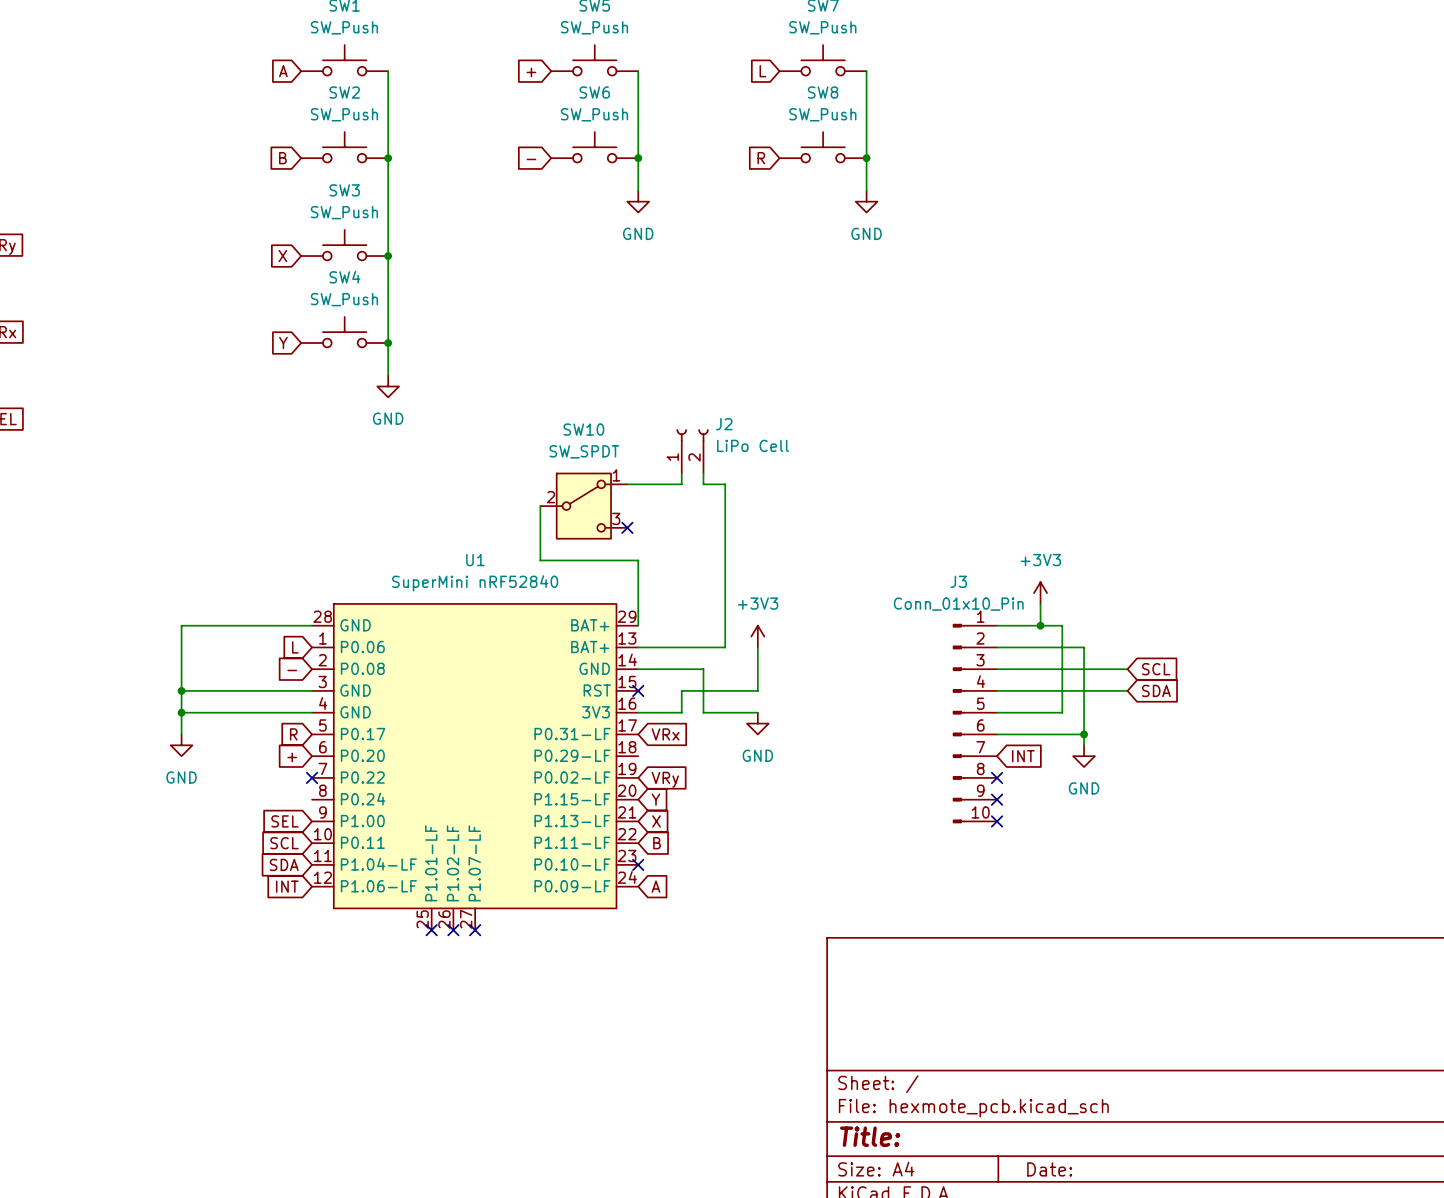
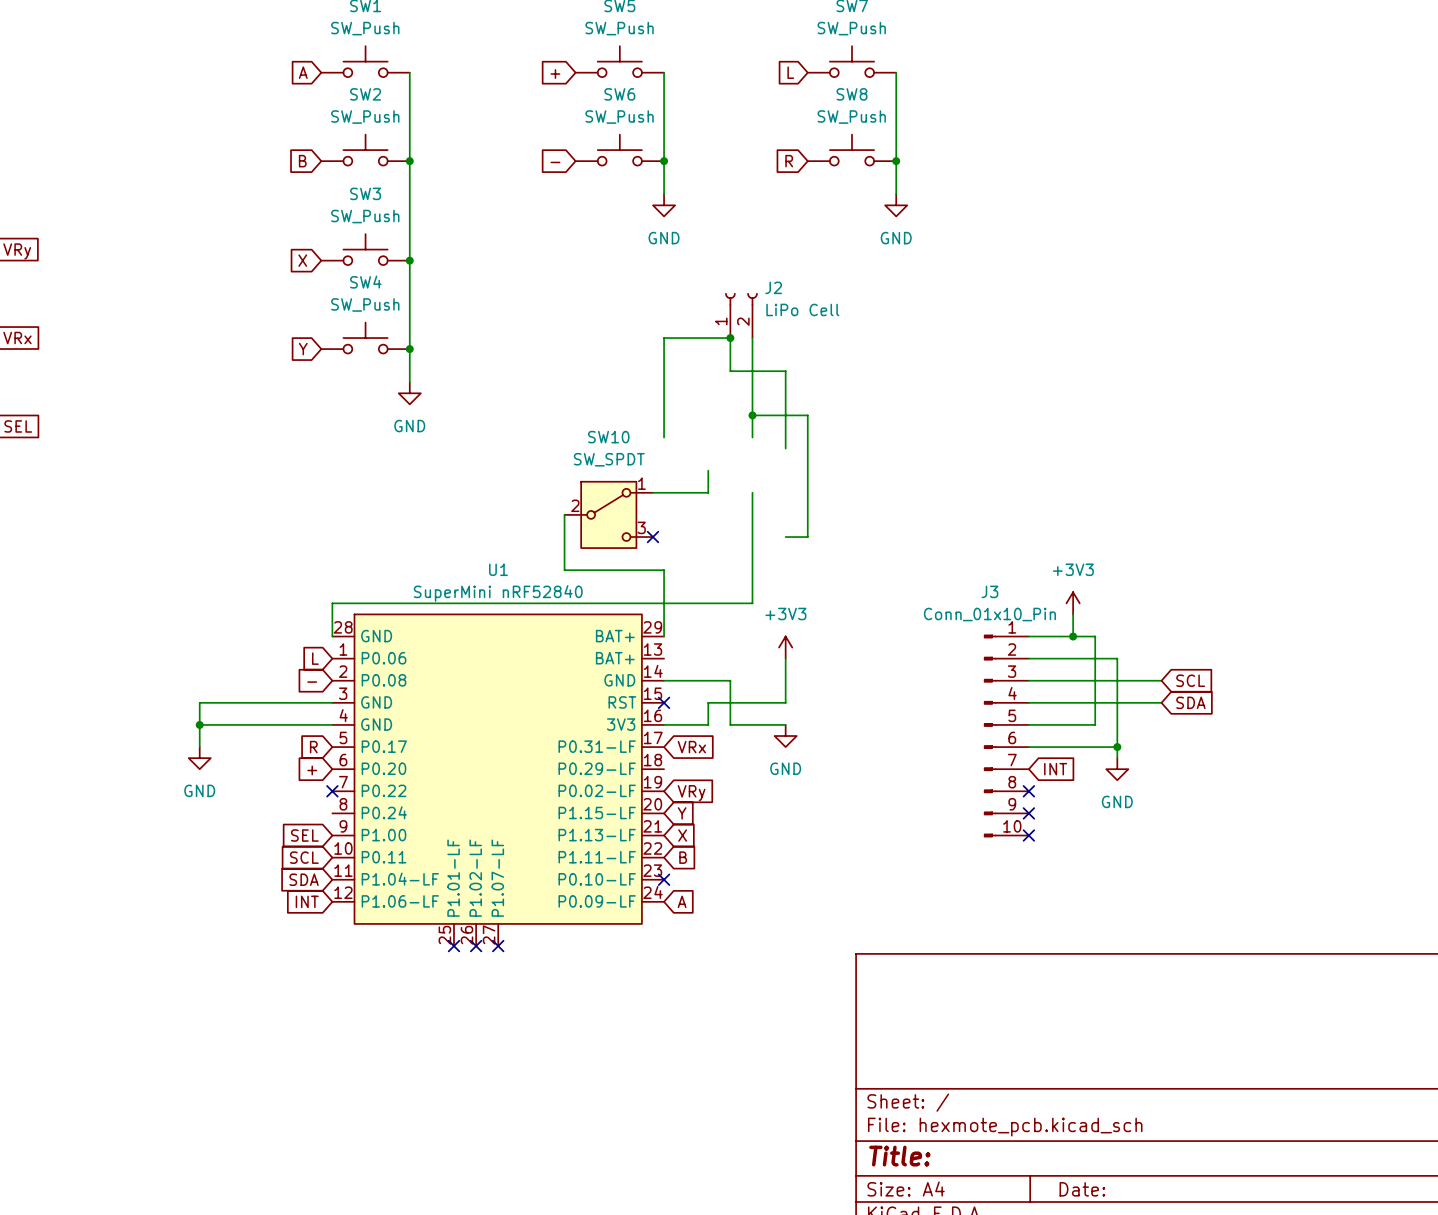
junction: none -> (730, 338)
wire: none -> (752, 338) (752, 437)
wire: none -> (752, 415) (807, 415) (807, 537) (785, 537)
junction: none -> (752, 415)
wire: none -> (664, 437) (664, 338) (730, 338) (730, 371) (785, 371) (785, 448)
J2 position: (692, 451) -> (741, 315)
wire: (703, 473) (703, 484) (725, 484) -> none
wire: (725, 593) (725, 647) (638, 647) -> (752, 603) (332, 603) (332, 636)
wire: (312, 625) (181, 625) (181, 690) -> none
junction: (181, 690) -> none

